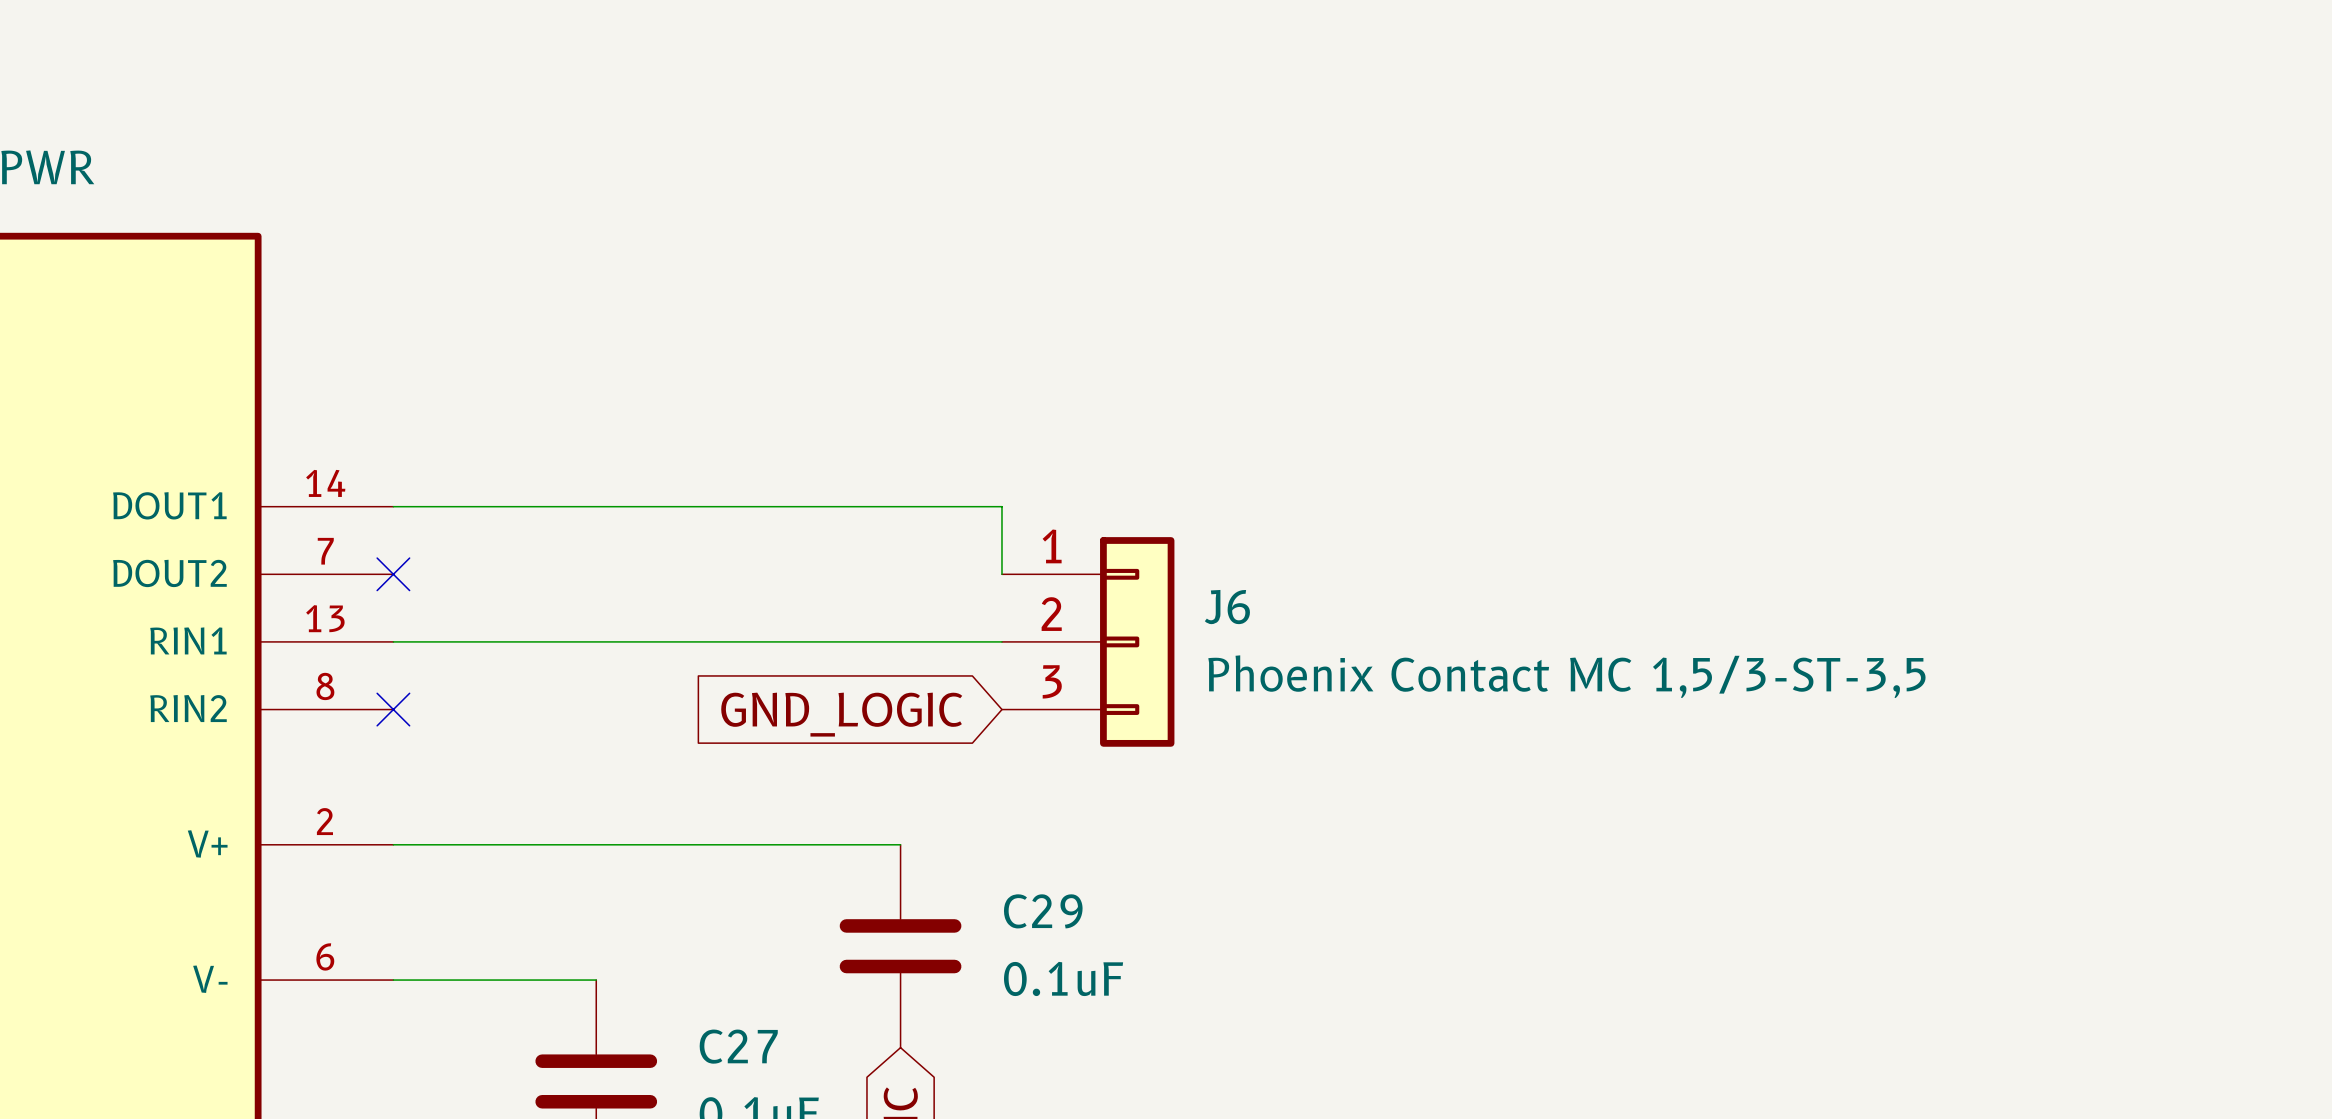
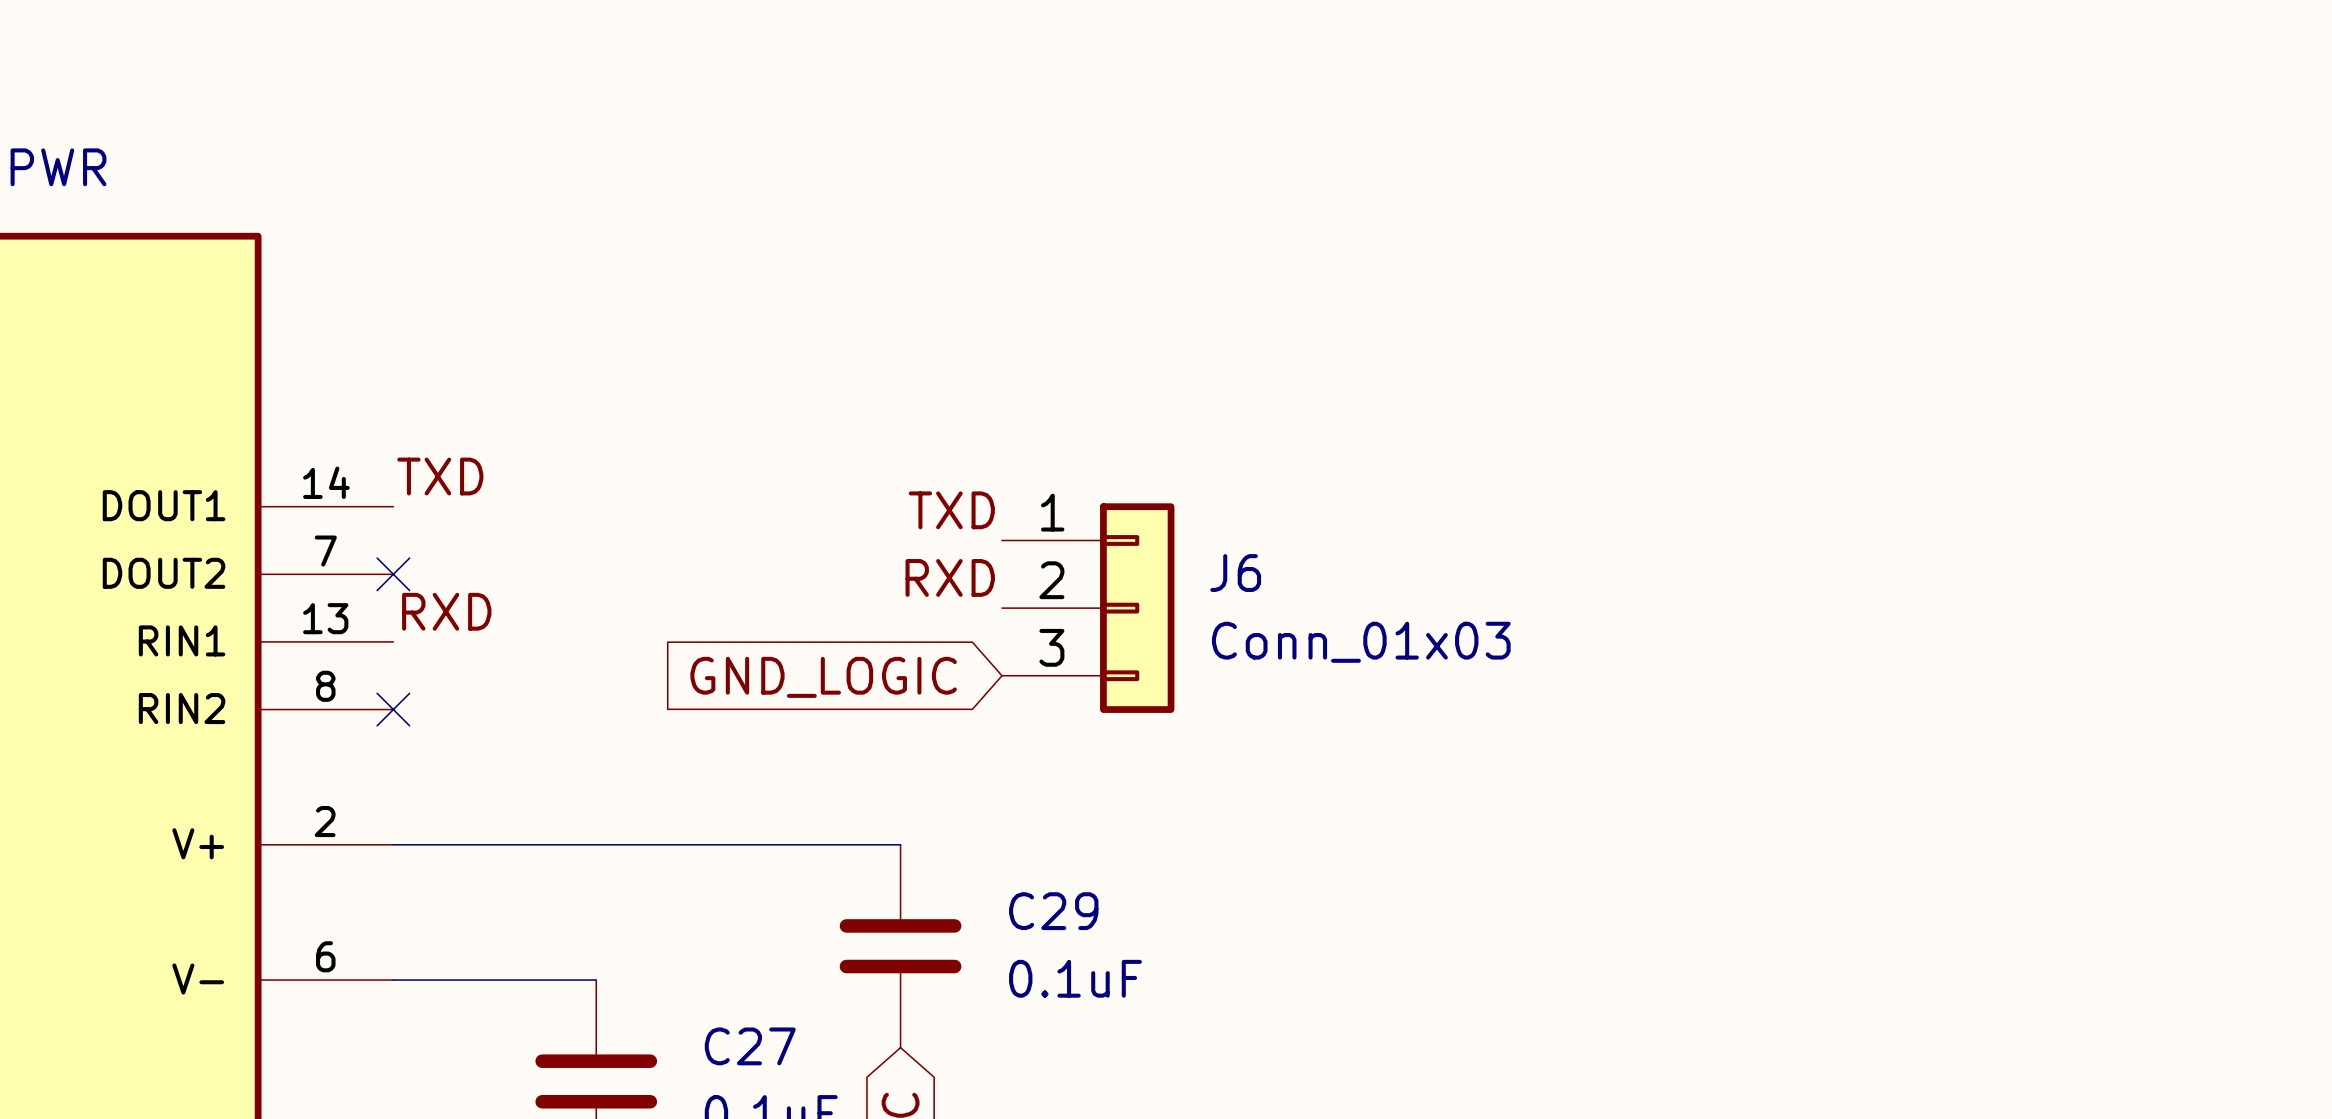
label: none -> TXD (440, 476)
wire: (393, 506) (1001, 506) (1001, 574) -> none
label: none -> TXD (951, 510)
label: none -> RXD (950, 577)
label: none -> RXD (446, 611)
wire: (393, 641) (1001, 641) -> none
J6 position: (1088, 641) -> (1088, 608)
J6 value: Phoenix Contact MC 1,5/3-ST-3,5 (1566, 676) -> Conn_01x03 (1361, 642)
global label position: GND_LOGIC (841, 714) -> GND_LOGIC (823, 677)

